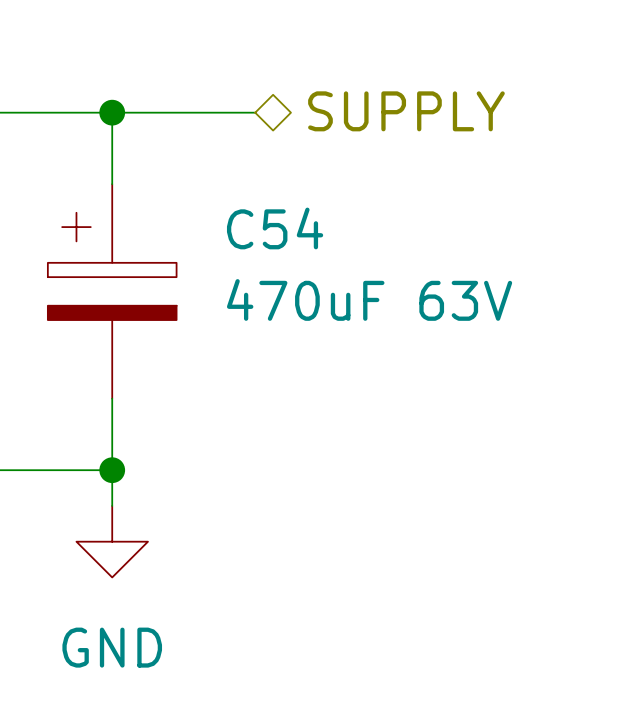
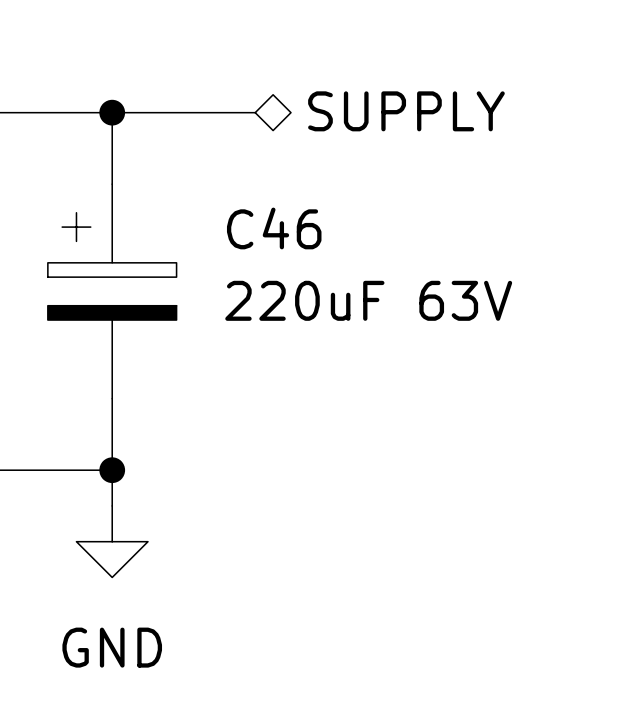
C54 name: C54 (275, 228) -> C46 (274, 228)
C54 value: 470uF 63V (369, 299) -> 220uF 63V (368, 300)

